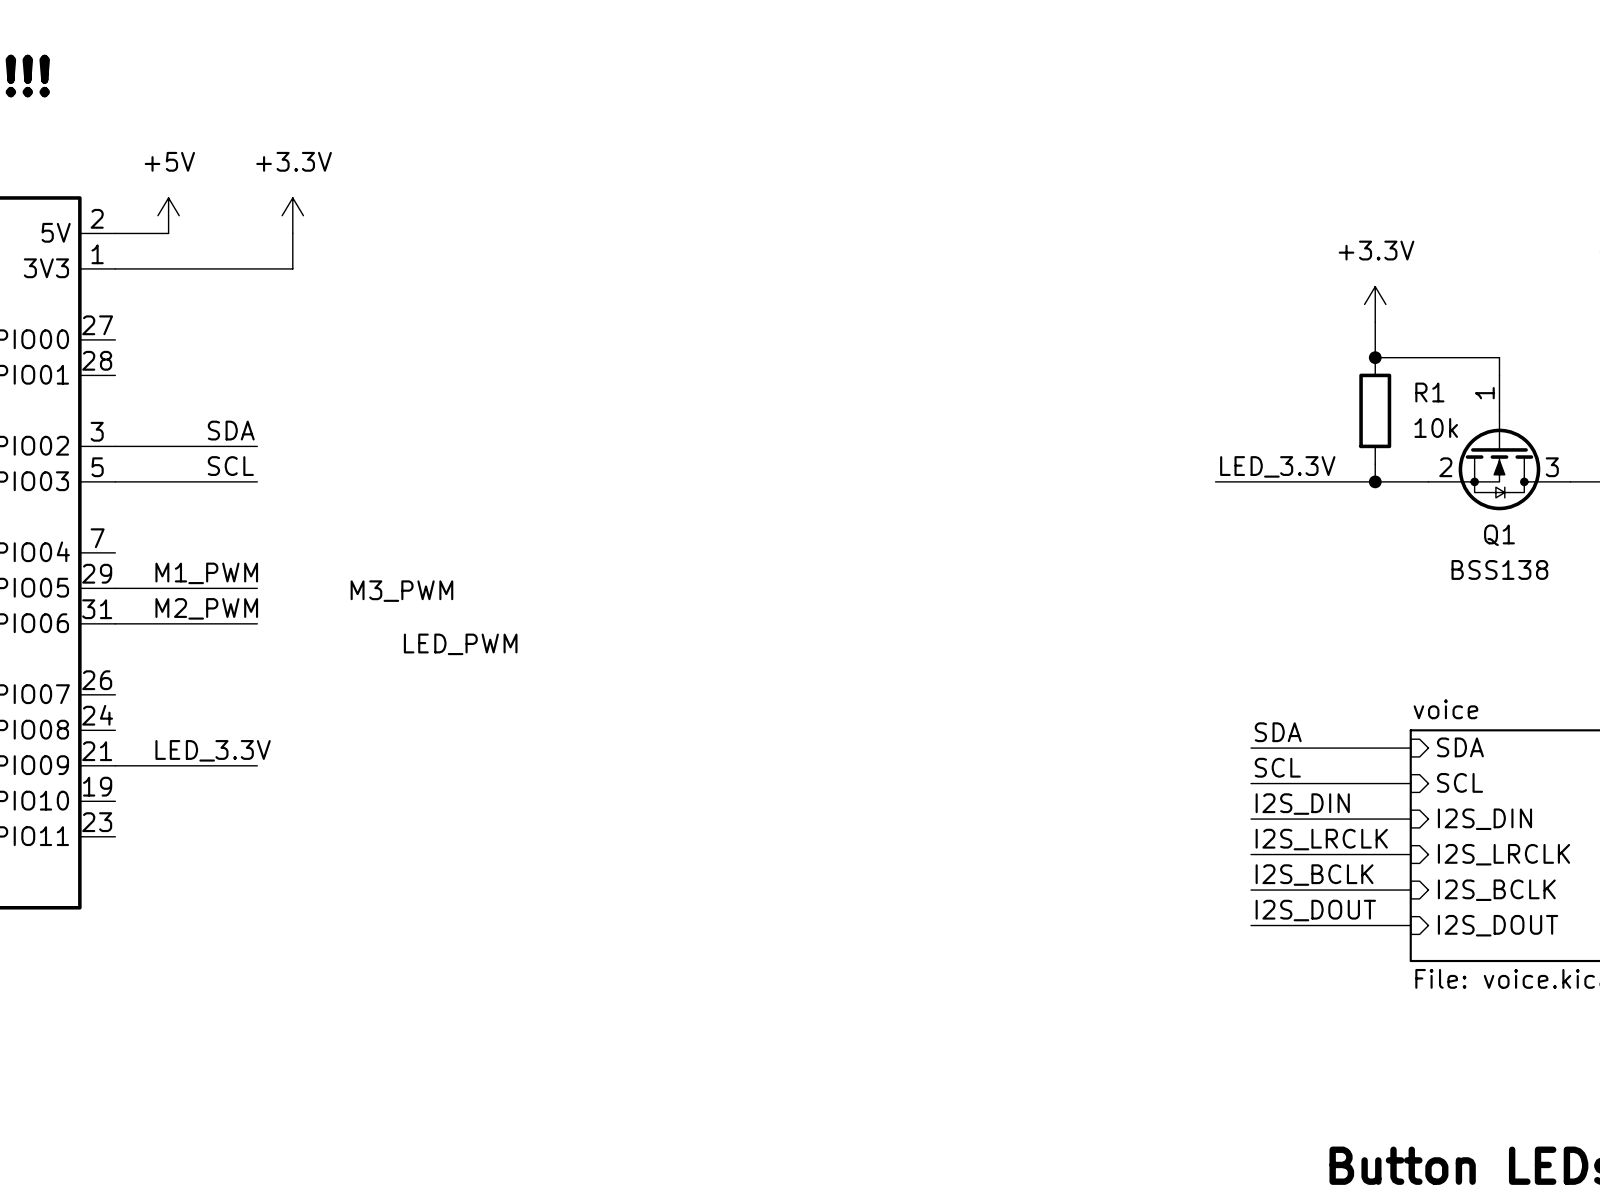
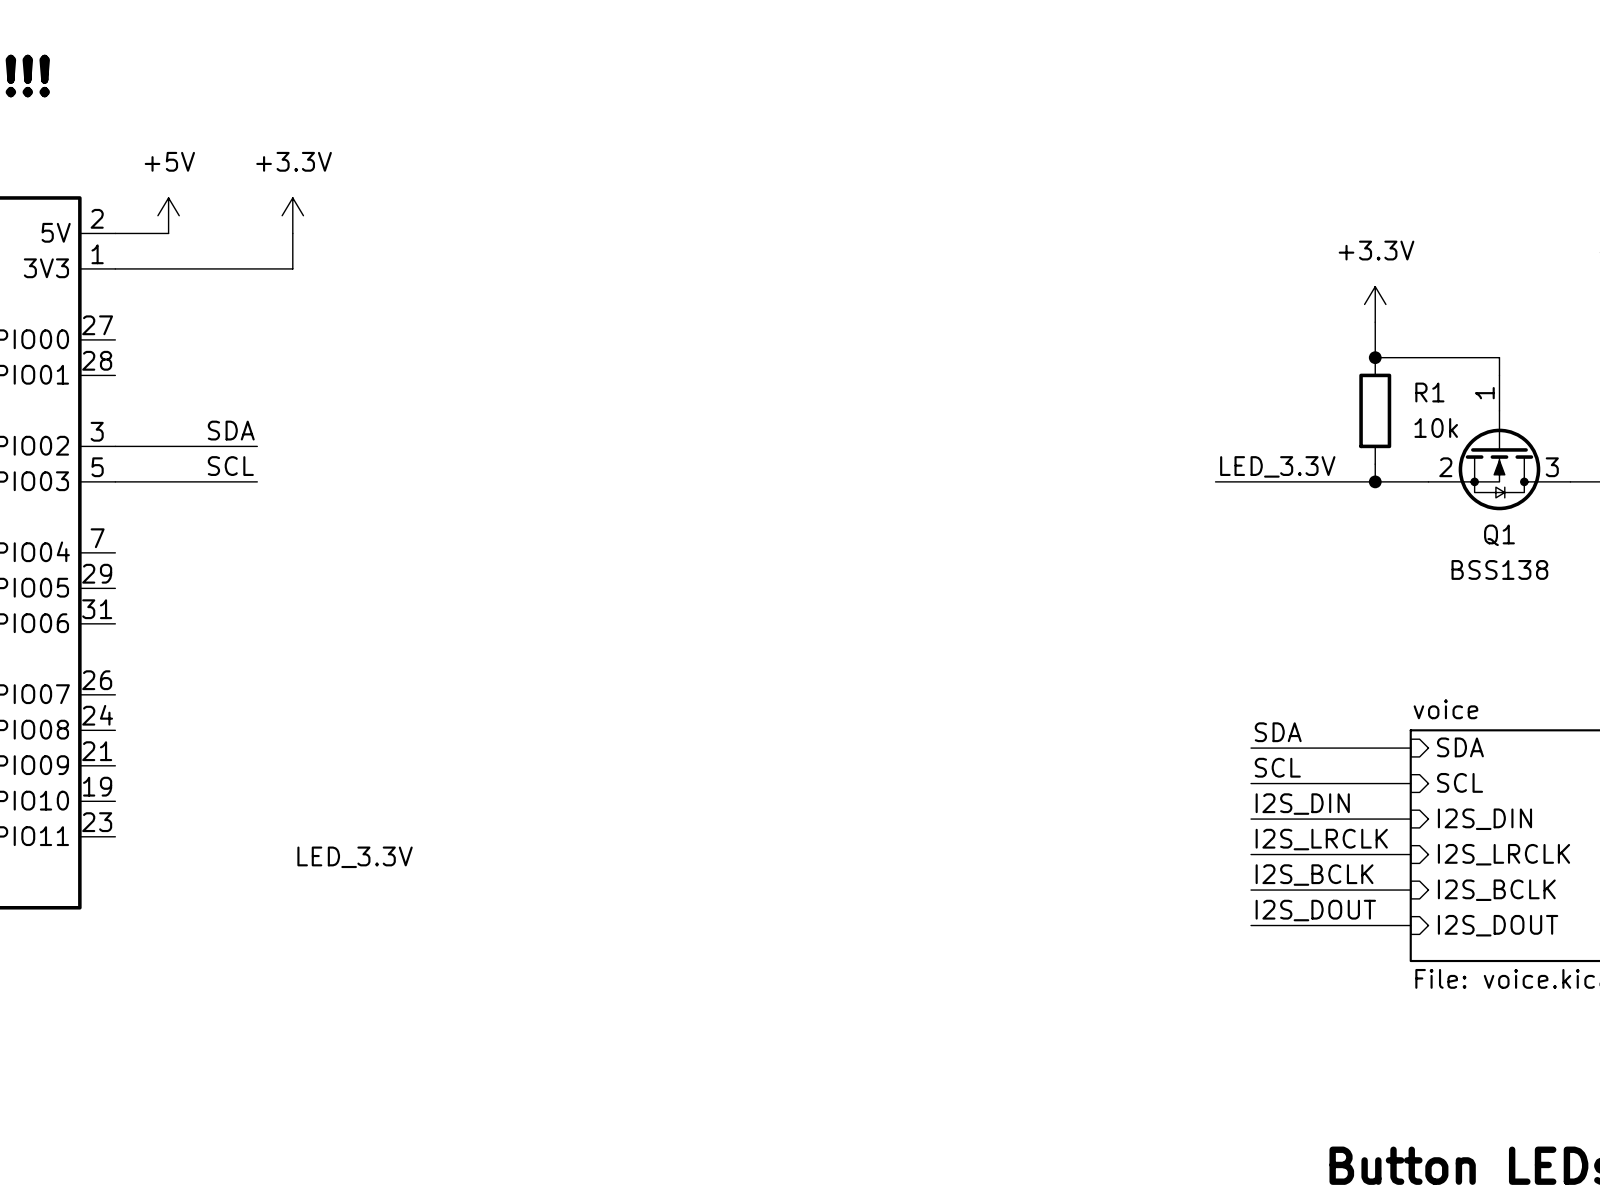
label: M1_PWM (206, 573) -> none
wire: (115, 588) (257, 588) -> none
label: M3_PWM (401, 591) -> none
label: M2_PWM (206, 608) -> none
wire: (115, 623) (257, 623) -> none
label: LED_PWM (460, 644) -> none
label position: LED_3.3V (213, 750) -> LED_3.3V (355, 857)
wire: (115, 765) (257, 765) -> none

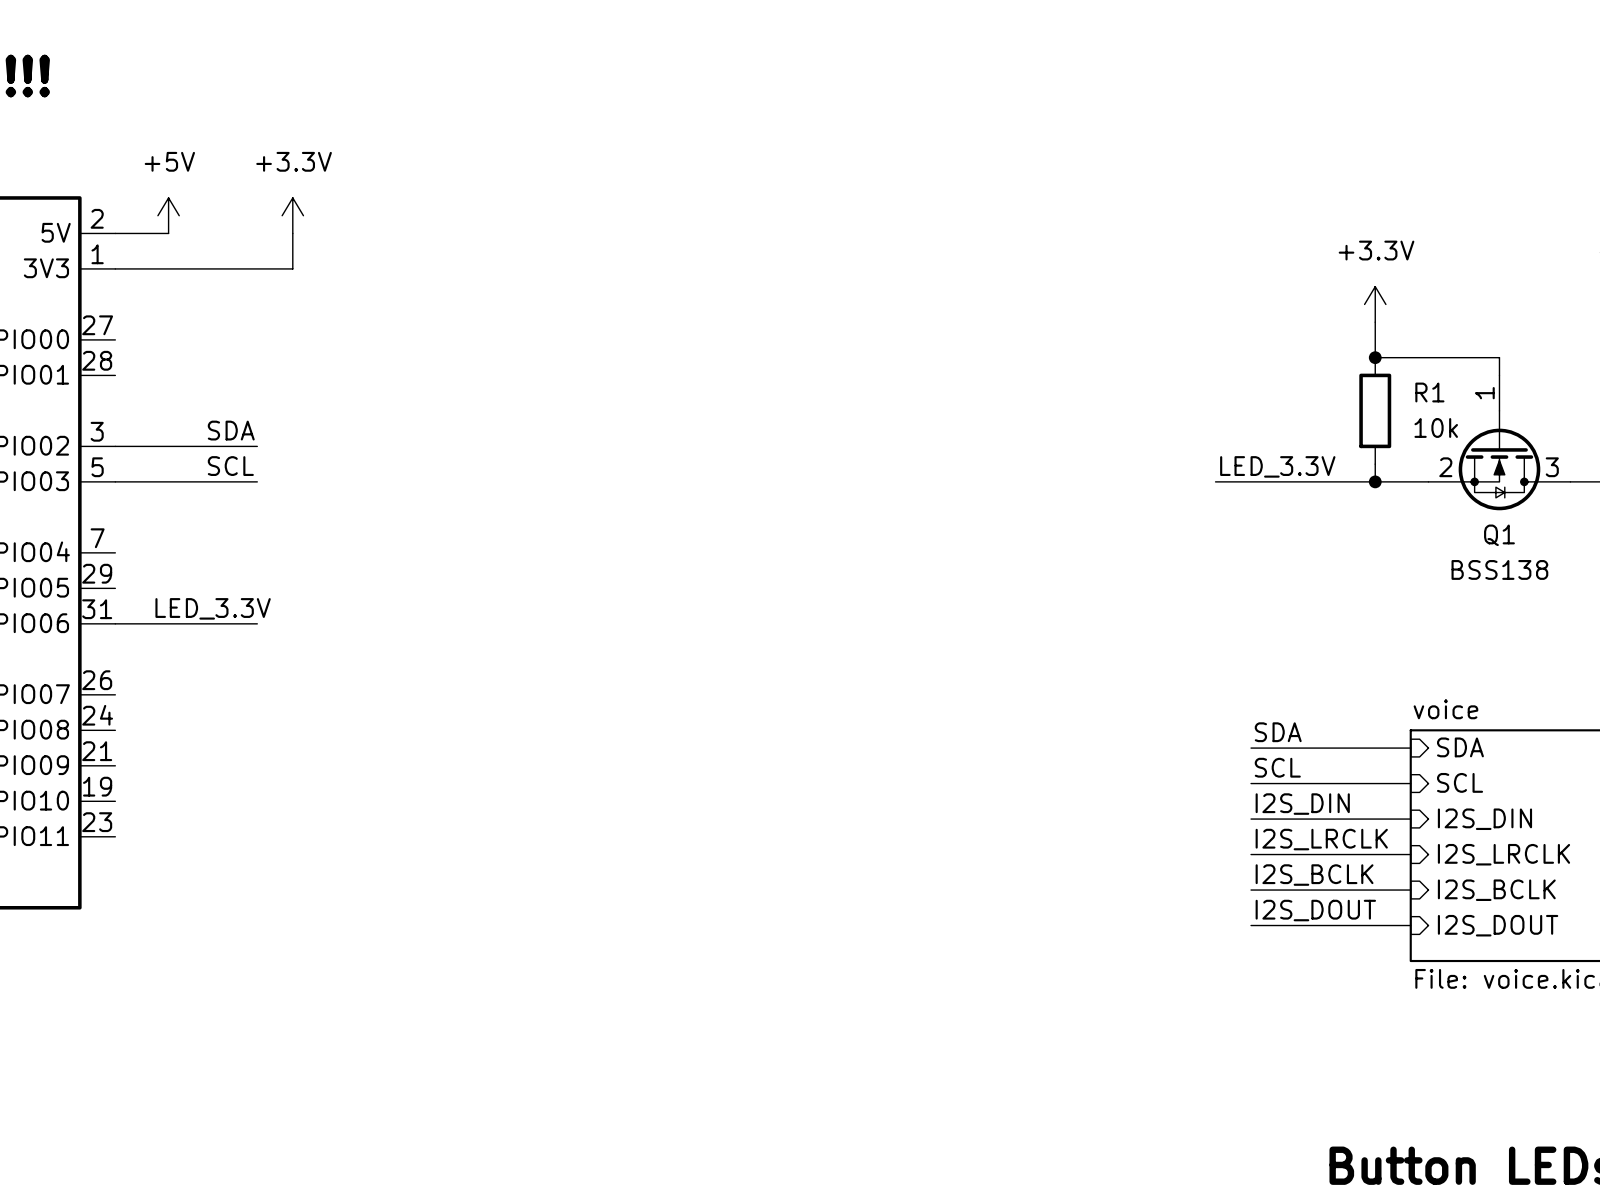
wire: none -> (115, 623) (257, 623)
label position: LED_3.3V (355, 857) -> LED_3.3V (213, 608)

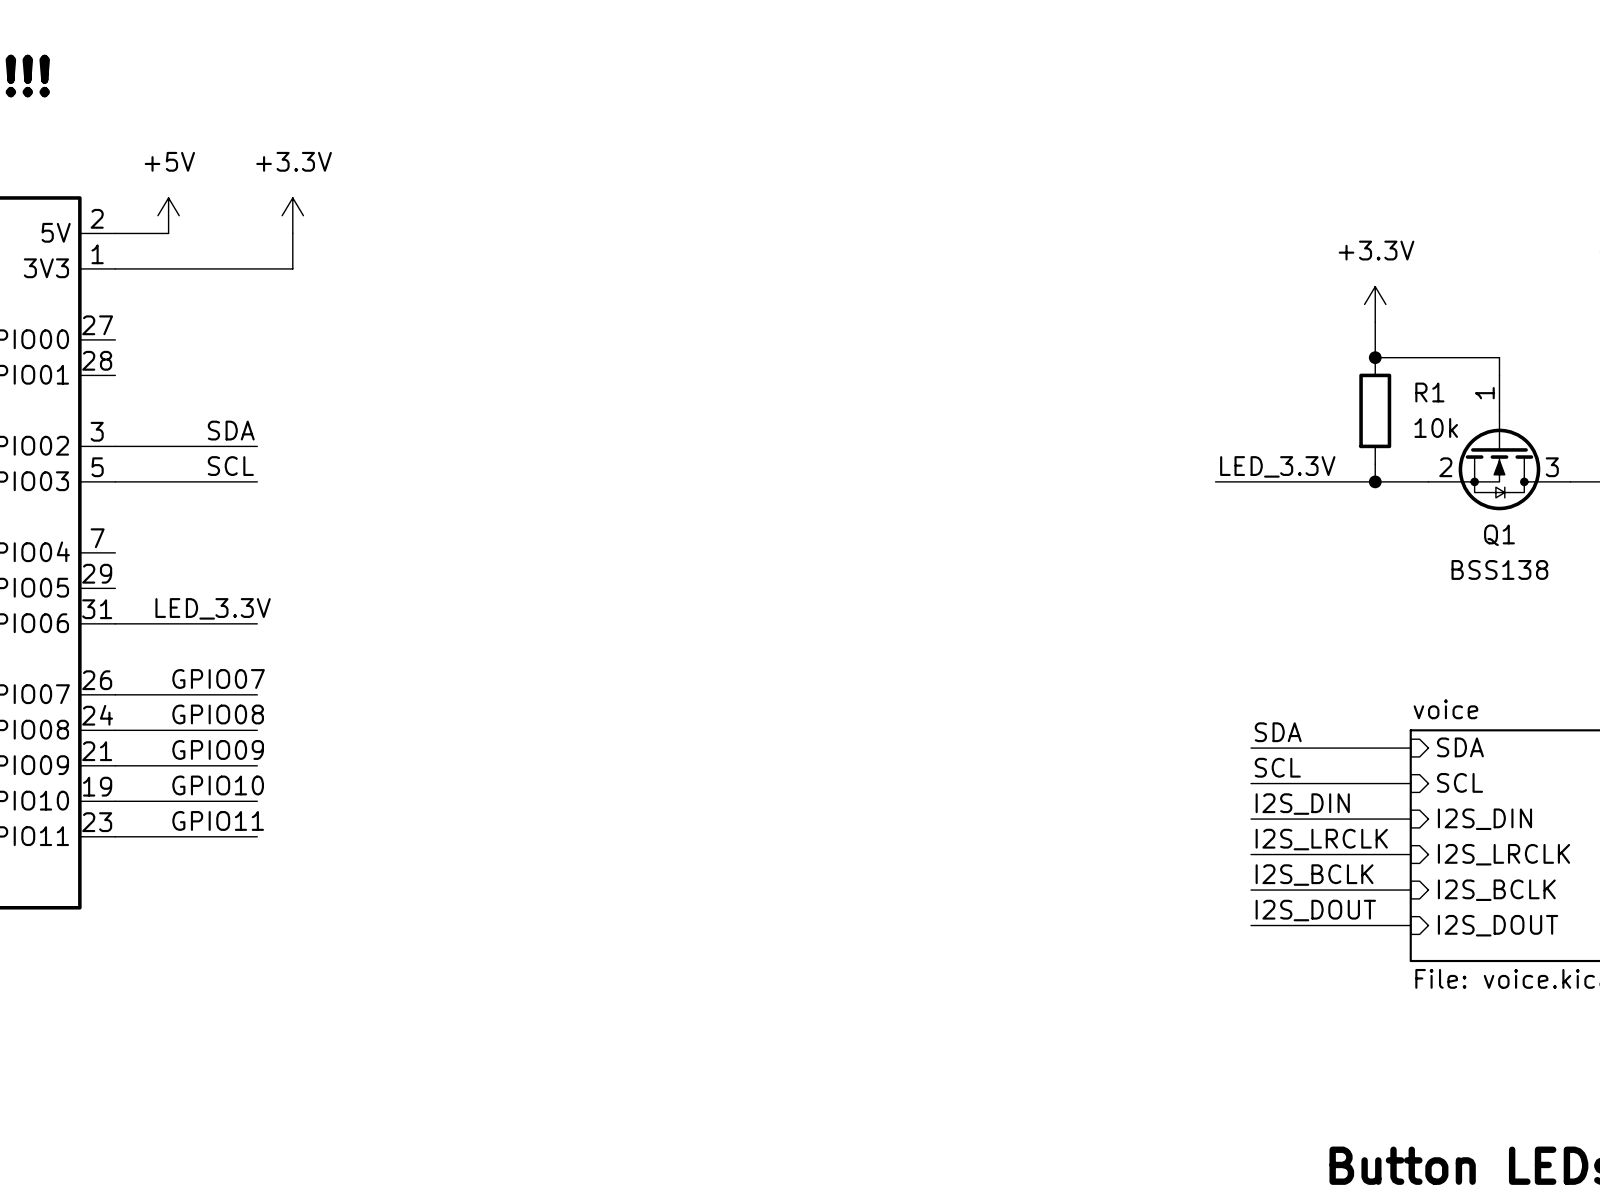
label: none -> GPIO07 (218, 679)
wire: none -> (115, 694) (257, 694)
label: none -> GPIO08 (218, 714)
wire: none -> (115, 730) (257, 730)
label: none -> GPIO09 (218, 749)
wire: none -> (115, 765) (257, 765)
label: none -> GPIO10 (218, 785)
wire: none -> (115, 801) (257, 801)
label: none -> GPIO11 (218, 820)
wire: none -> (115, 836) (257, 836)

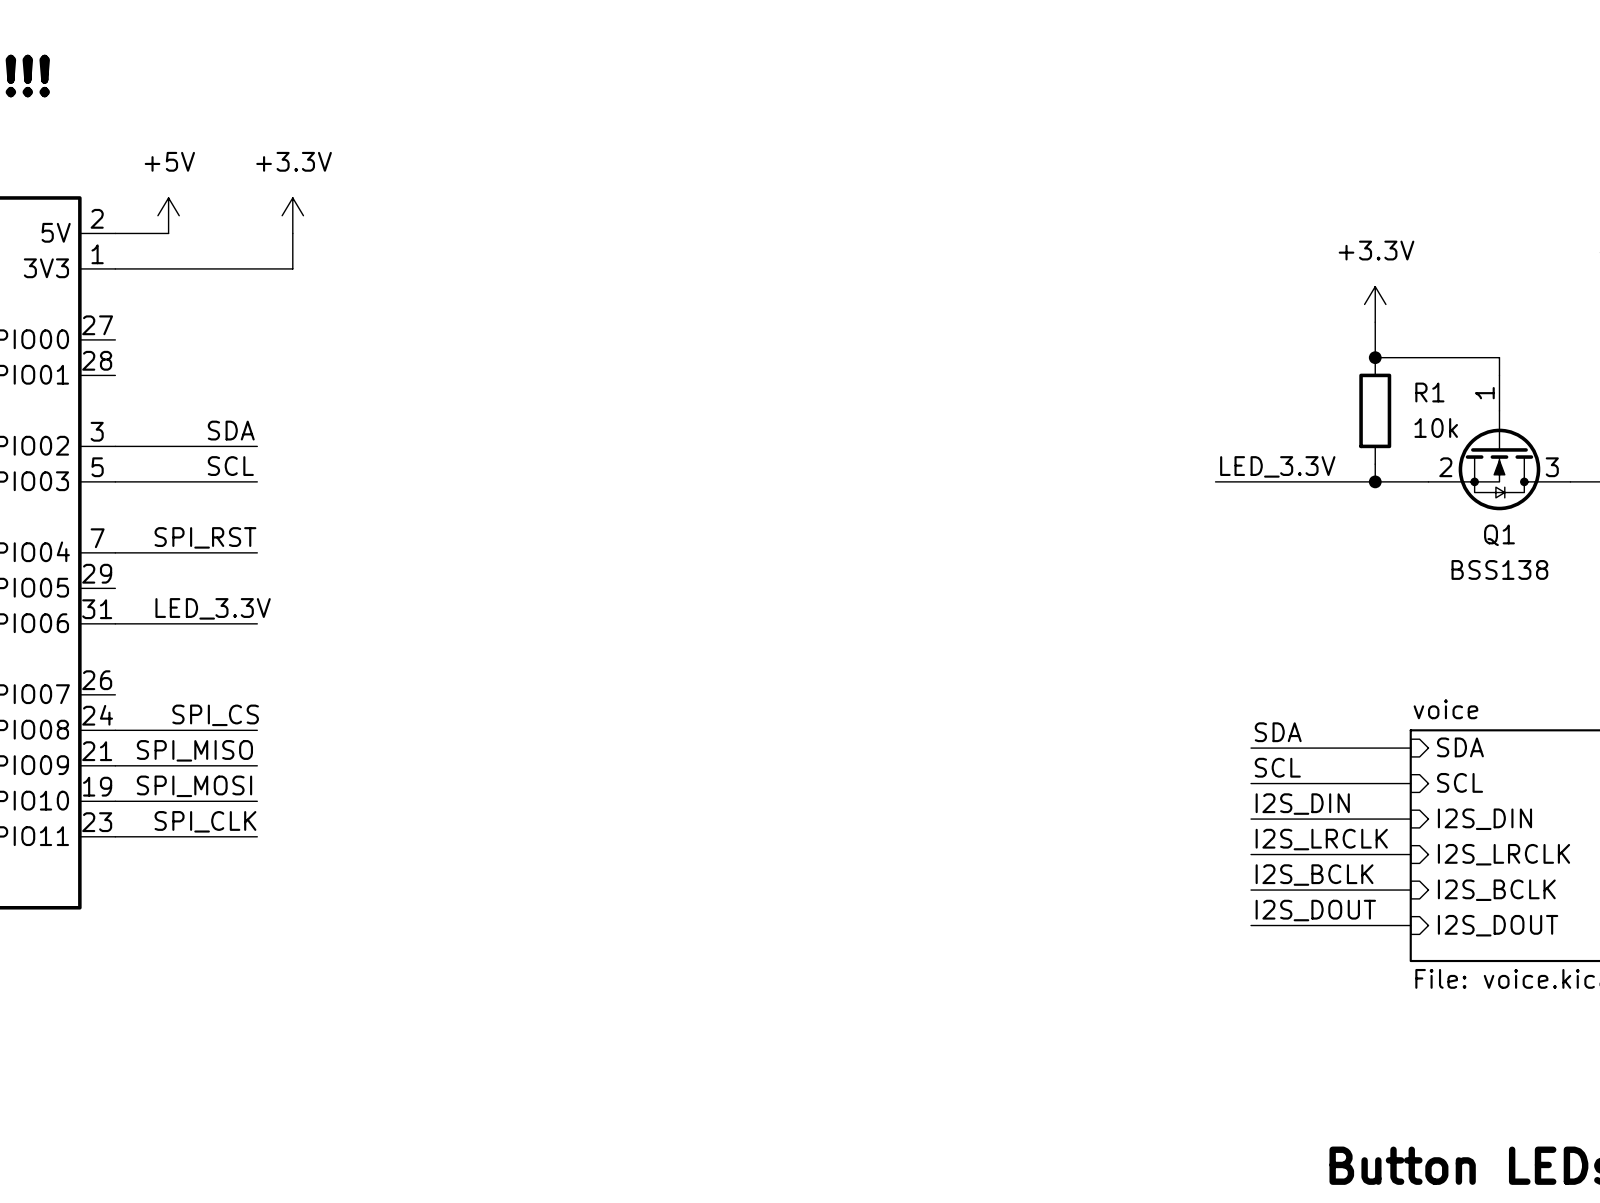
label: none -> SPI_RST (205, 537)
label: GPIO07 (218, 679) -> none
wire: (115, 694) (257, 694) -> (115, 552) (257, 552)
label: GPIO08 (218, 714) -> SPI_CS (215, 715)
label: GPIO09 (218, 749) -> none
label: none -> SPI_MISO (194, 750)
label: GPIO10 (218, 785) -> none
label: none -> SPI_MOSI (194, 786)
label: GPIO11 (218, 820) -> none
label: none -> SPI_CLK (205, 821)

